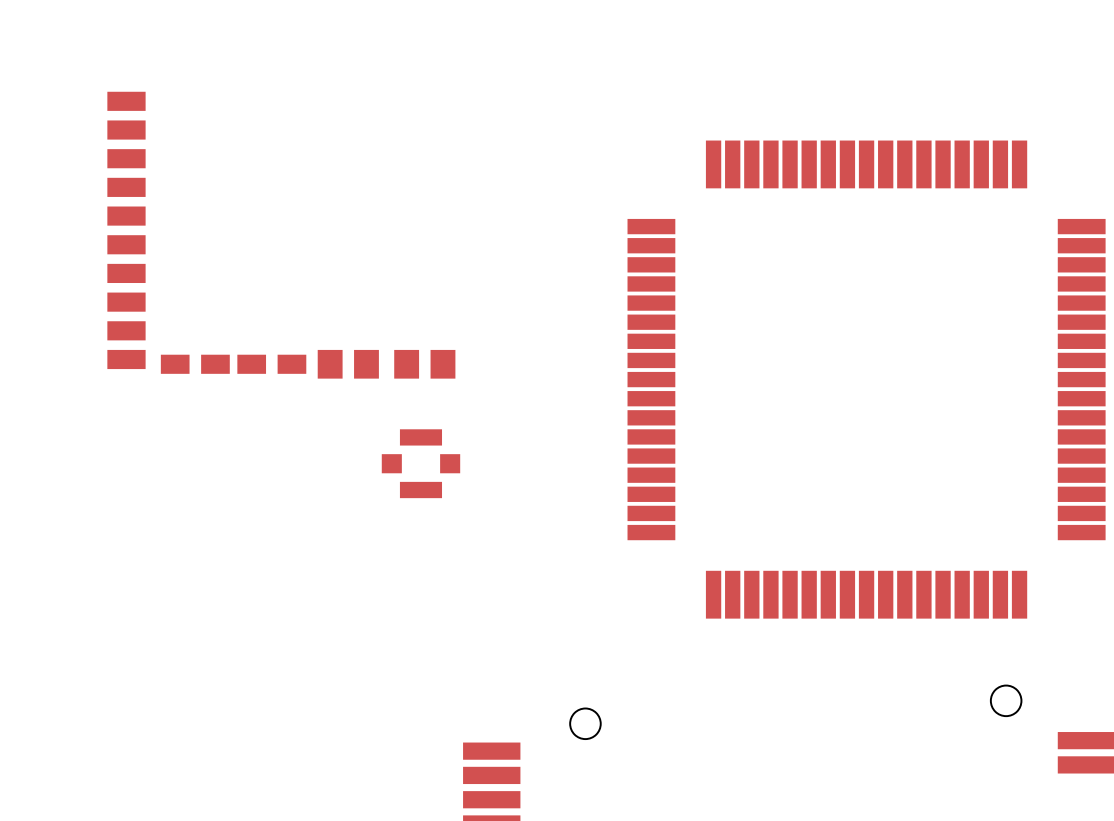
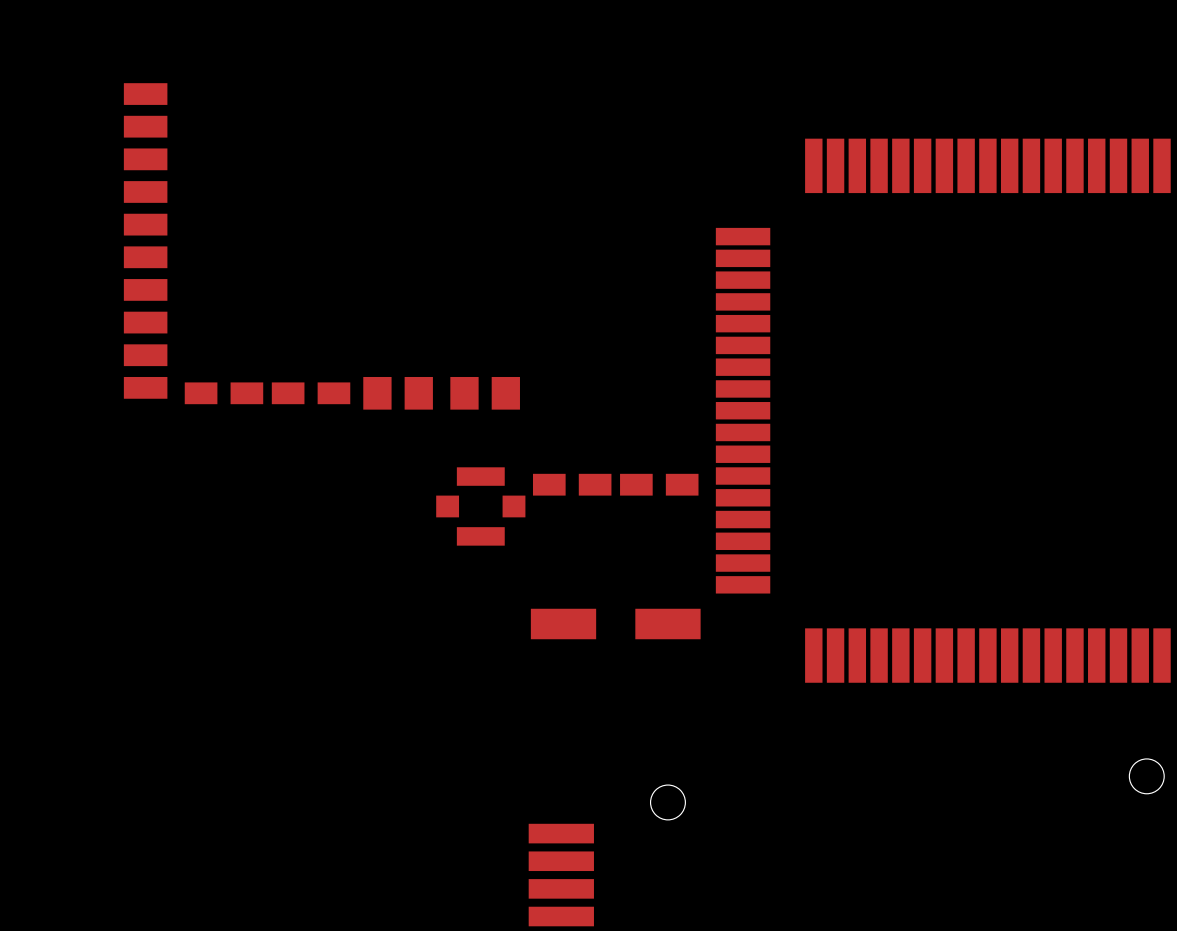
part: none -> (572, 484)
part: none -> (659, 484)
part: none -> (615, 624)

